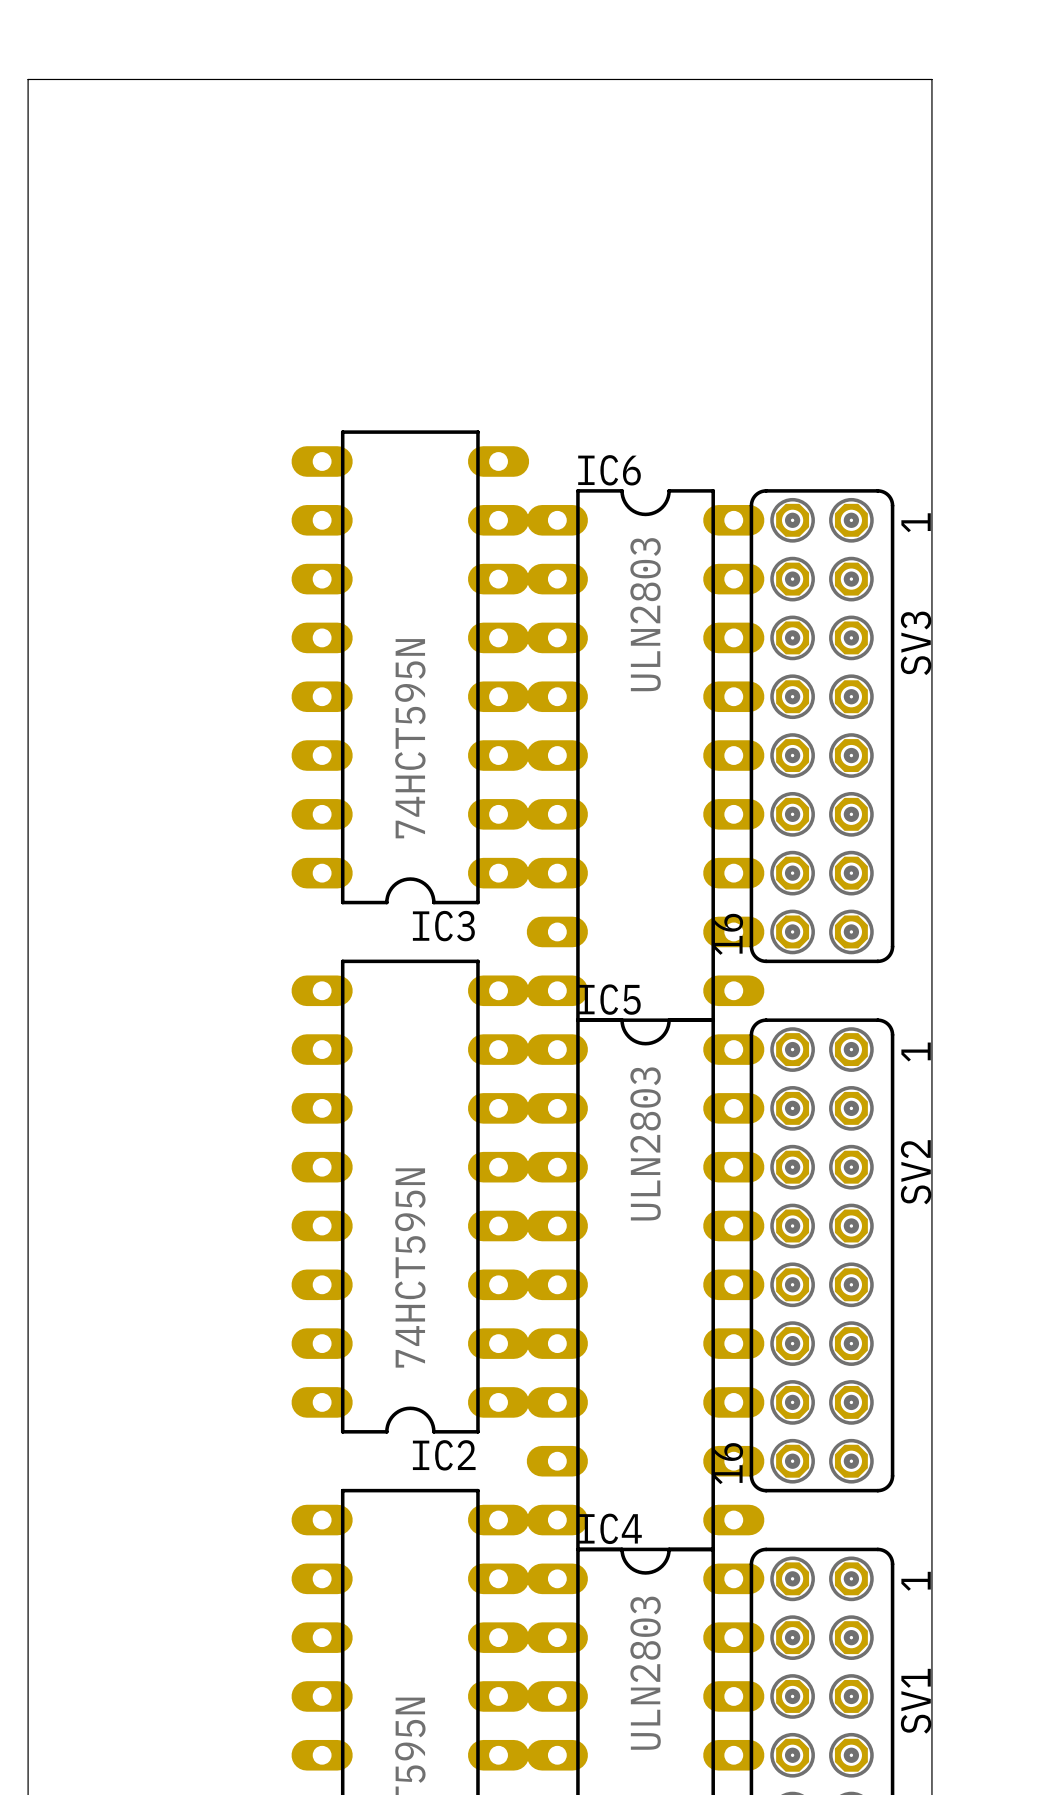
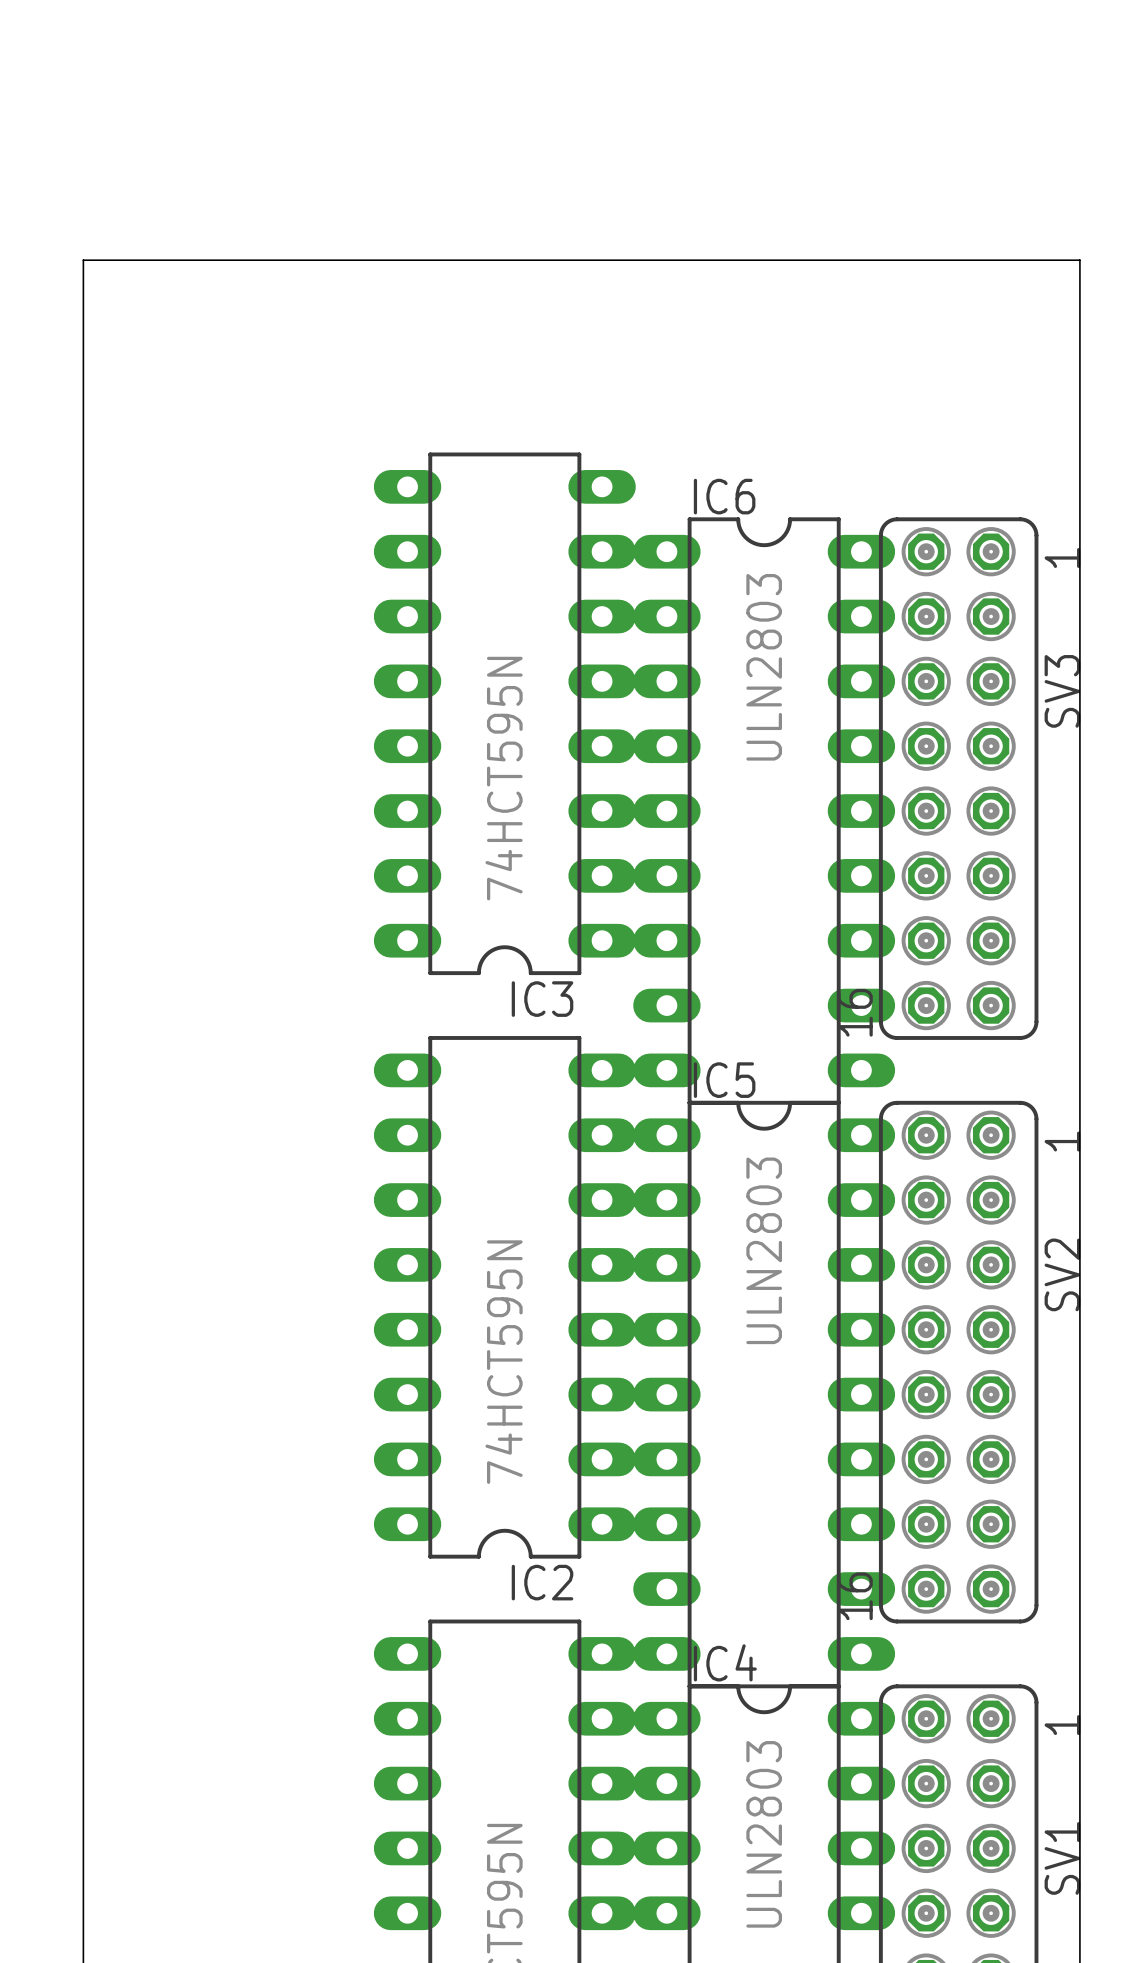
board edge: (28, 255) (28, 79) (931, 79) (931, 255) -> (83, 260) (1079, 260)

